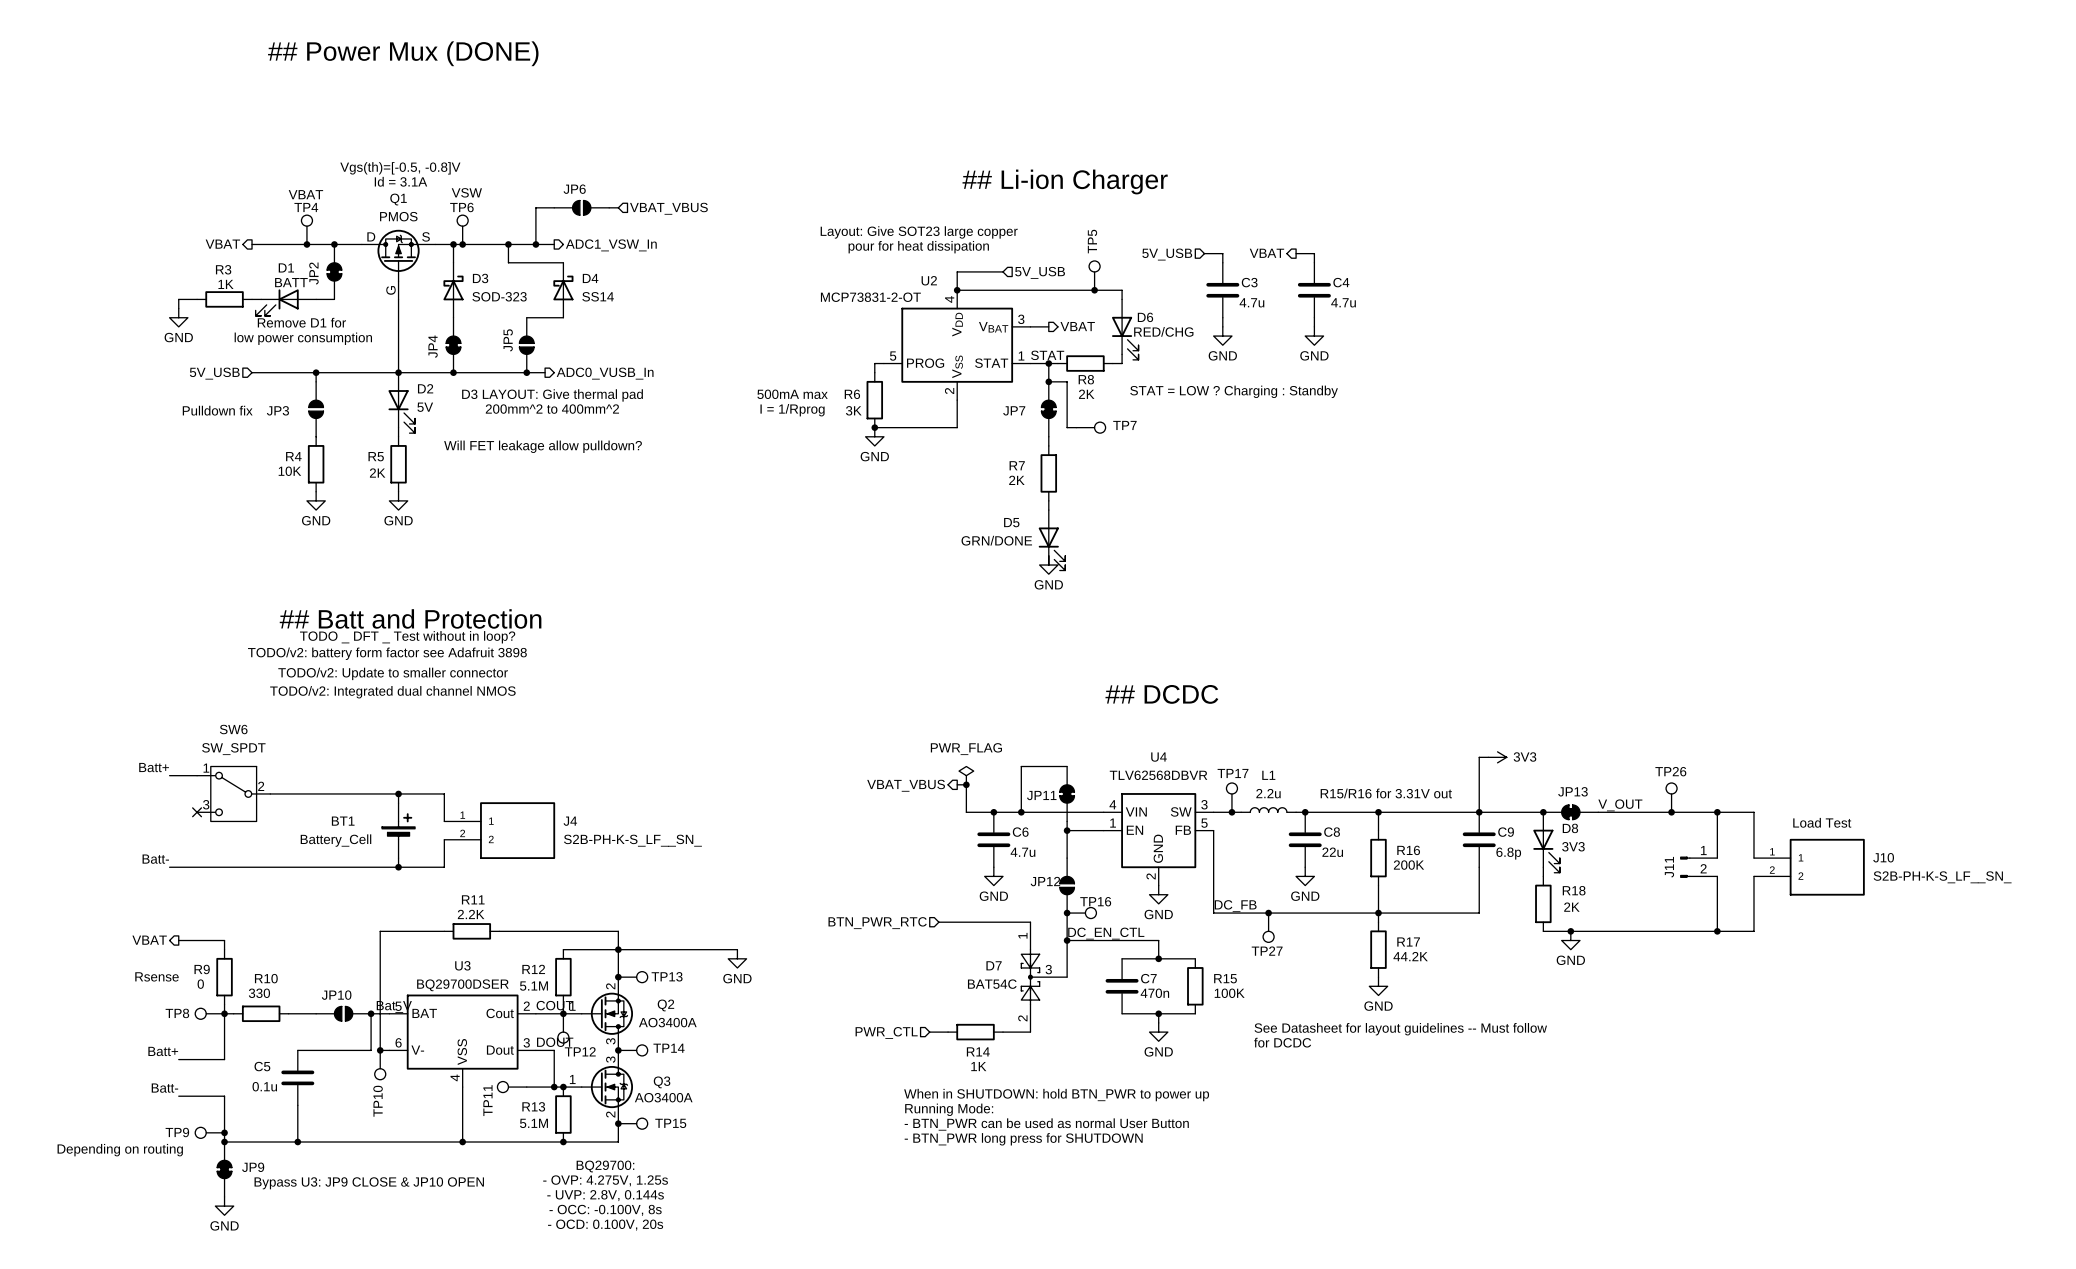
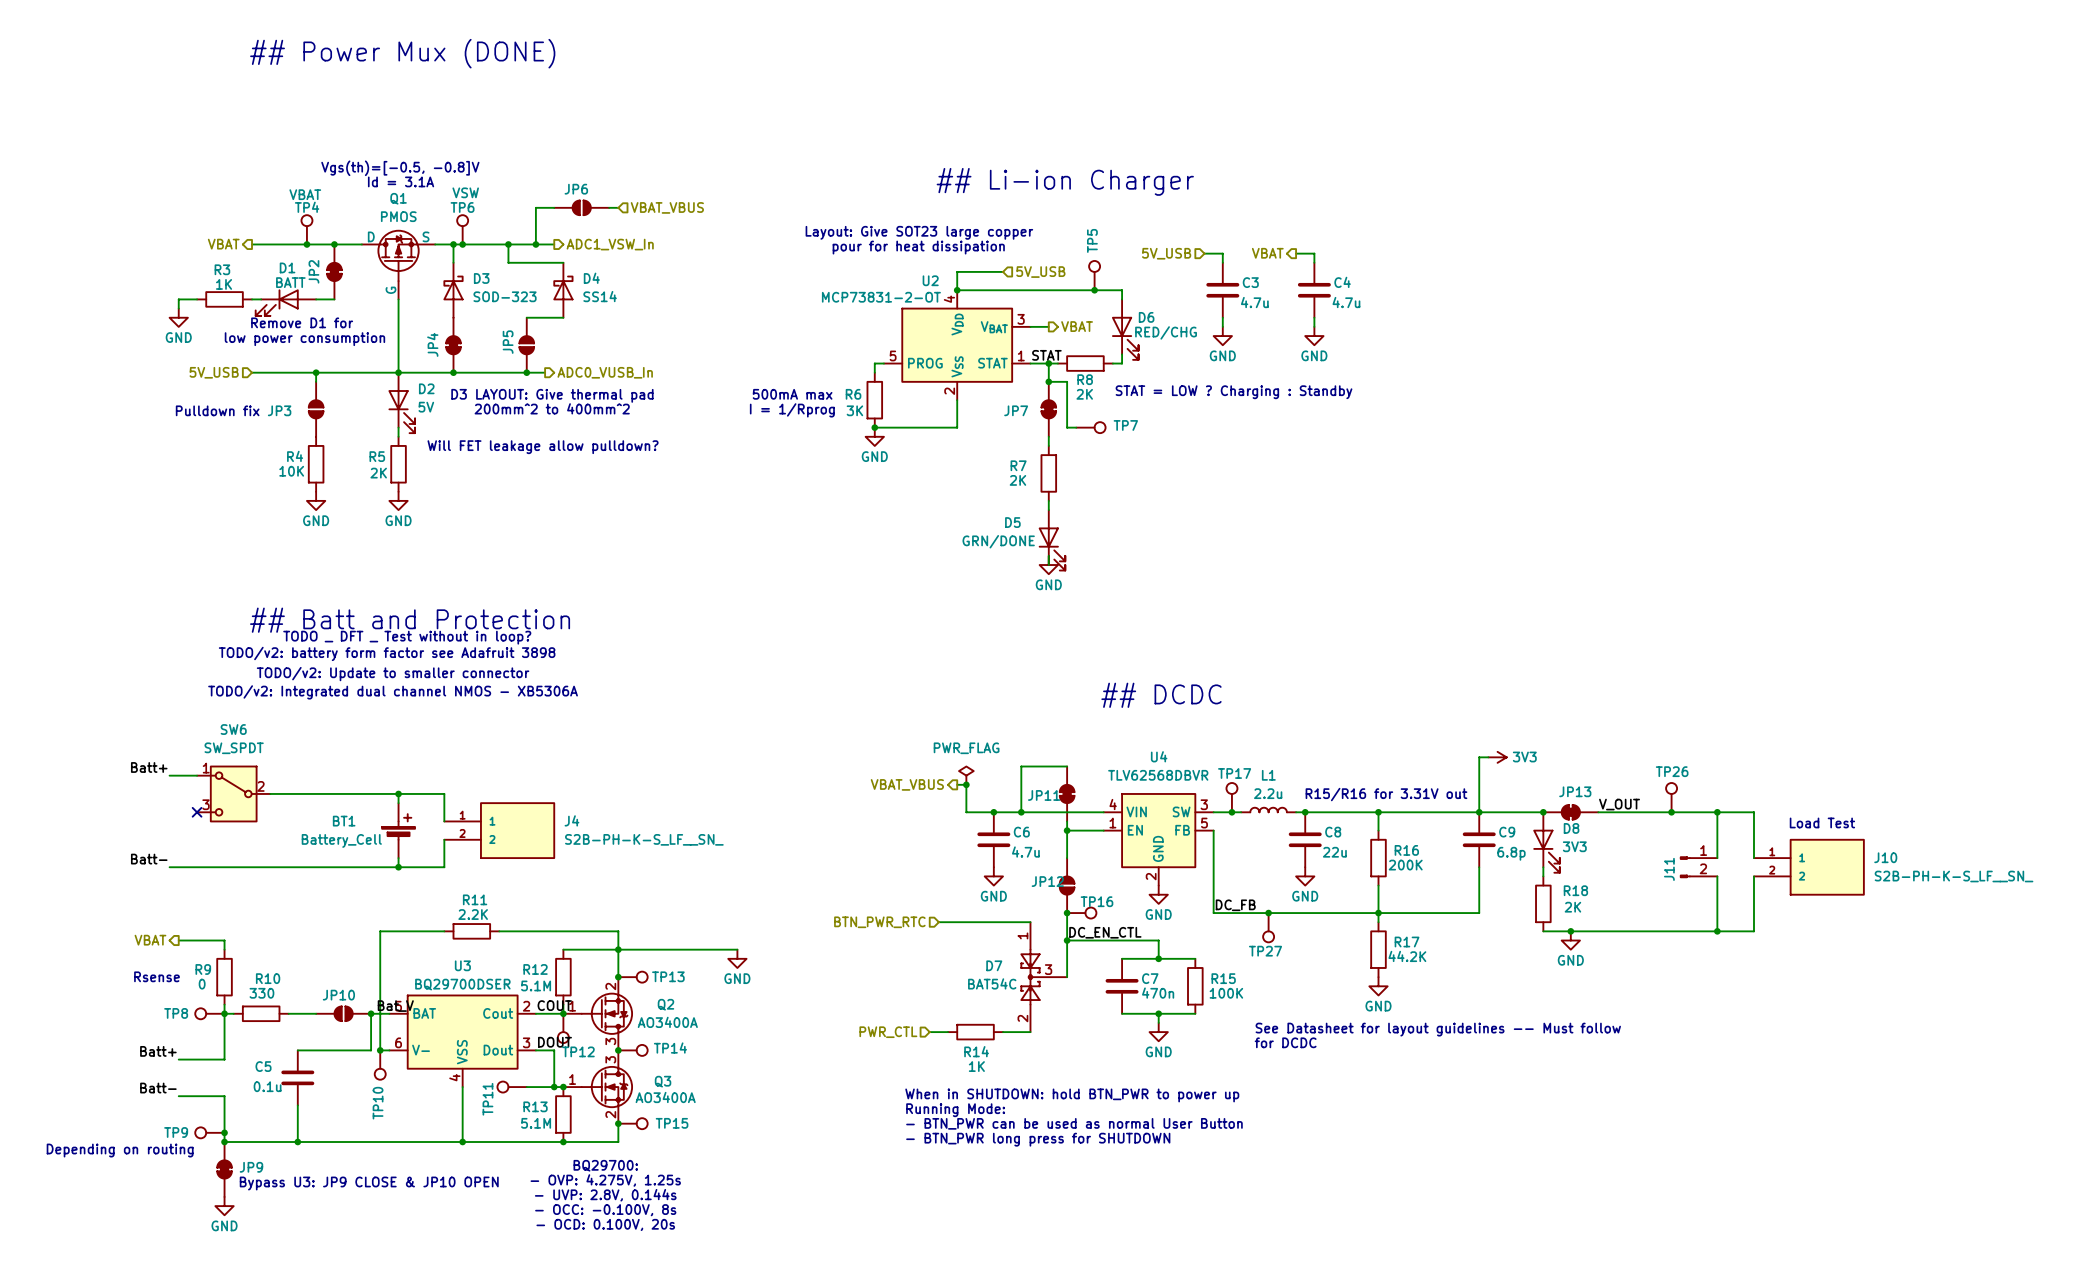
text: TODO/v2: Integrated dual channel NMOS (392, 692) -> TODO/v2: Integrated dual channel NMOS - XB5306A (393, 692)

